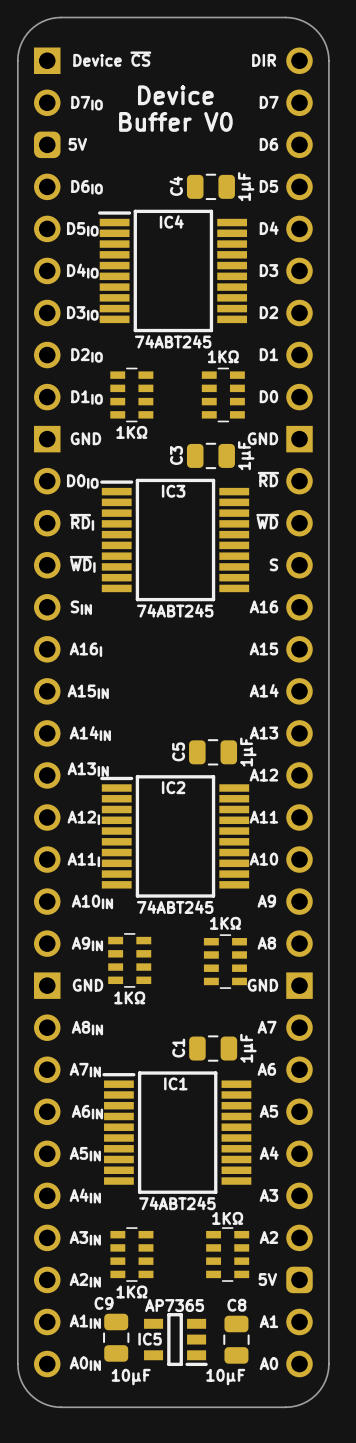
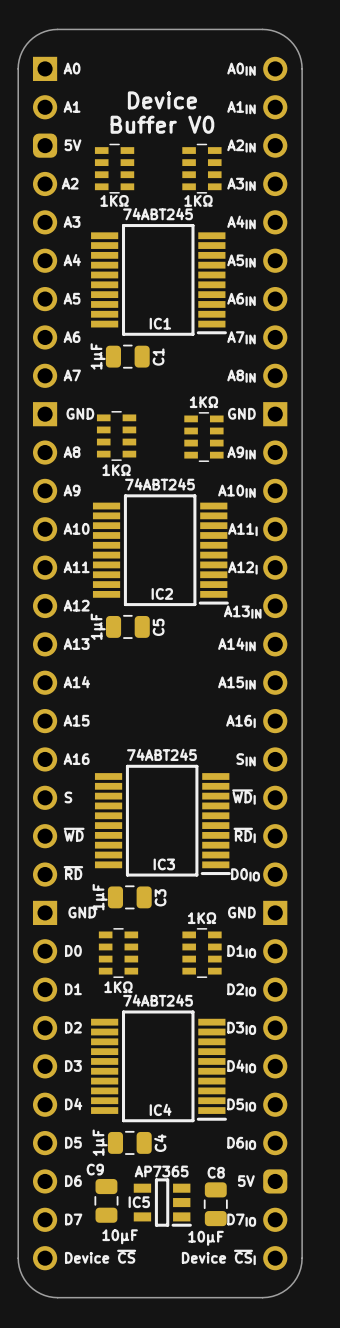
text: Device ~{CS} (112, 59) -> A0 (72, 68)
text: DIR (264, 60) -> A0IN (241, 69)
text: D7 (269, 102) -> A1IN (241, 107)
text: D7IO (87, 103) -> A1 (72, 106)
text: D6 (268, 144) -> A2IN (241, 145)
part: none -> (114, 168)
part: none -> (201, 168)
C4 name position: C4 (176, 186) -> C4 (160, 1143)
C4 position: (210, 186) -> (129, 1142)
C4 value position: 1μF (246, 186) -> 1μF (100, 1142)
text: D5 (268, 186) -> A3IN (241, 184)
text: D6IO (87, 187) -> A2 (70, 183)
text: D4 (269, 228) -> A4IN (241, 222)
text: D5IO (82, 229) -> A3 (72, 222)
IC4 rotation: 0° (172, 270) -> 180° (159, 1066)
IC4 position: (172, 270) -> (159, 1066)
text: D3 (268, 270) -> A5IN (241, 261)
text: D4IO (82, 271) -> A4 (72, 260)
text: D2 (268, 312) -> A6IN (241, 299)
text: D3IO (82, 313) -> A5 (72, 298)
text: D1 (268, 354) -> A7IN (241, 337)
text: D2IO (87, 355) -> A6 (72, 337)
part: (131, 394) -> none
part: (223, 394) -> none
text: D0 (268, 396) -> A8IN (241, 376)
text: D1IO (87, 397) -> A7 (72, 375)
C3 name position: C3 (176, 455) -> C3 (160, 897)
C3 position: (210, 455) -> (129, 897)
C3 value position: 1μF (246, 455) -> 1μF (100, 897)
part: none -> (116, 435)
part: none -> (203, 437)
text: ~{RD} (268, 479) -> A9IN (241, 452)
text: D0IO (82, 481) -> A8 (72, 452)
text: ~{WD} (267, 521) -> A10IN (236, 491)
text: ~{RD}I (81, 522) -> A9 (72, 490)
IC3 rotation: 0° (174, 540) -> 180° (162, 820)
IC3 position: (174, 540) -> (162, 820)
text: ~{WD}I (82, 564) -> A10 (76, 528)
text: S (273, 564) -> A11I (242, 529)
text: A16 (263, 606) -> A12I (242, 567)
text: SIN (81, 607) -> A11 (76, 567)
text position: A15 (263, 648) -> A15 (76, 720)
text: A16I (85, 649) -> A12 (76, 605)
text: A14 (264, 690) -> A14IN (236, 644)
text: A15IN (88, 691) -> A13 (76, 644)
text: A14IN (90, 733) -> A14 (76, 682)
text: A13 (263, 733) -> A15IN (236, 683)
C5 name position: C5 (178, 751) -> C5 (158, 627)
C5 position: (213, 752) -> (127, 626)
C5 value position: 1μF (248, 752) -> 1μF (98, 626)
text position: A13IN (88, 769) -> A13IN (242, 612)
text: A12 (263, 775) -> A16I (240, 721)
text: A12I (83, 817) -> A16 (76, 759)
text: A11 (263, 817) -> SIN (246, 759)
IC2 rotation: 0° (174, 836) -> 180° (160, 550)
IC2 position: (174, 836) -> (160, 550)
text: A11I (83, 859) -> S (68, 797)
text: A10 (263, 859) -> ~{WD}I (243, 797)
text: A10IN (92, 901) -> ~{WD} (74, 834)
text: A9 (266, 901) -> ~{RD}I (244, 835)
text: A8 (266, 943) -> D0IO (245, 874)
text: A9IN (87, 944) -> ~{RD} (73, 873)
part: (129, 960) -> none
part: (225, 961) -> none
text: A7 (267, 1027) -> D1IO (241, 951)
text: A8IN (87, 1028) -> D0 (73, 950)
part: none -> (118, 953)
part: none -> (202, 953)
C1 name position: C1 (178, 1048) -> C1 (158, 357)
C1 position: (213, 1048) -> (127, 356)
C1 value position: 1μF (248, 1048) -> 1μF (98, 356)
text: A6 (266, 1069) -> D2IO (241, 989)
text: A7IN (85, 1070) -> D1 (73, 989)
text: A5 (268, 1111) -> D3IO (241, 1028)
text: A6IN (87, 1112) -> D2 (73, 1027)
IC1 rotation: 0° (176, 1132) -> 180° (159, 279)
IC1 position: (176, 1132) -> (159, 279)
text: A4 (269, 1153) -> D4IO (241, 1066)
text: A5IN (85, 1154) -> D3 (73, 1066)
text: A3 (268, 1195) -> D5IO (241, 1105)
text: A4IN (85, 1196) -> D4 (73, 1104)
text: A2 (268, 1237) -> D6IO (241, 1143)
text: A3IN (85, 1238) -> D5 (73, 1142)
part: (131, 1254) -> none
part: (227, 1254) -> none
text: A2IN (85, 1280) -> D6 (73, 1181)
text: A1IN (85, 1321) -> D7 (73, 1219)
text: A1 (268, 1321) -> D7IO (241, 1220)
C9 position: (116, 1337) -> (106, 1200)
IC5 position: (175, 1339) -> (162, 1202)
C8 position: (236, 1339) -> (215, 1204)
text: A0IN (85, 1363) -> Device ~{CS} (100, 1256)
text: A0 (268, 1363) -> Device ~{CS}I (218, 1257)

